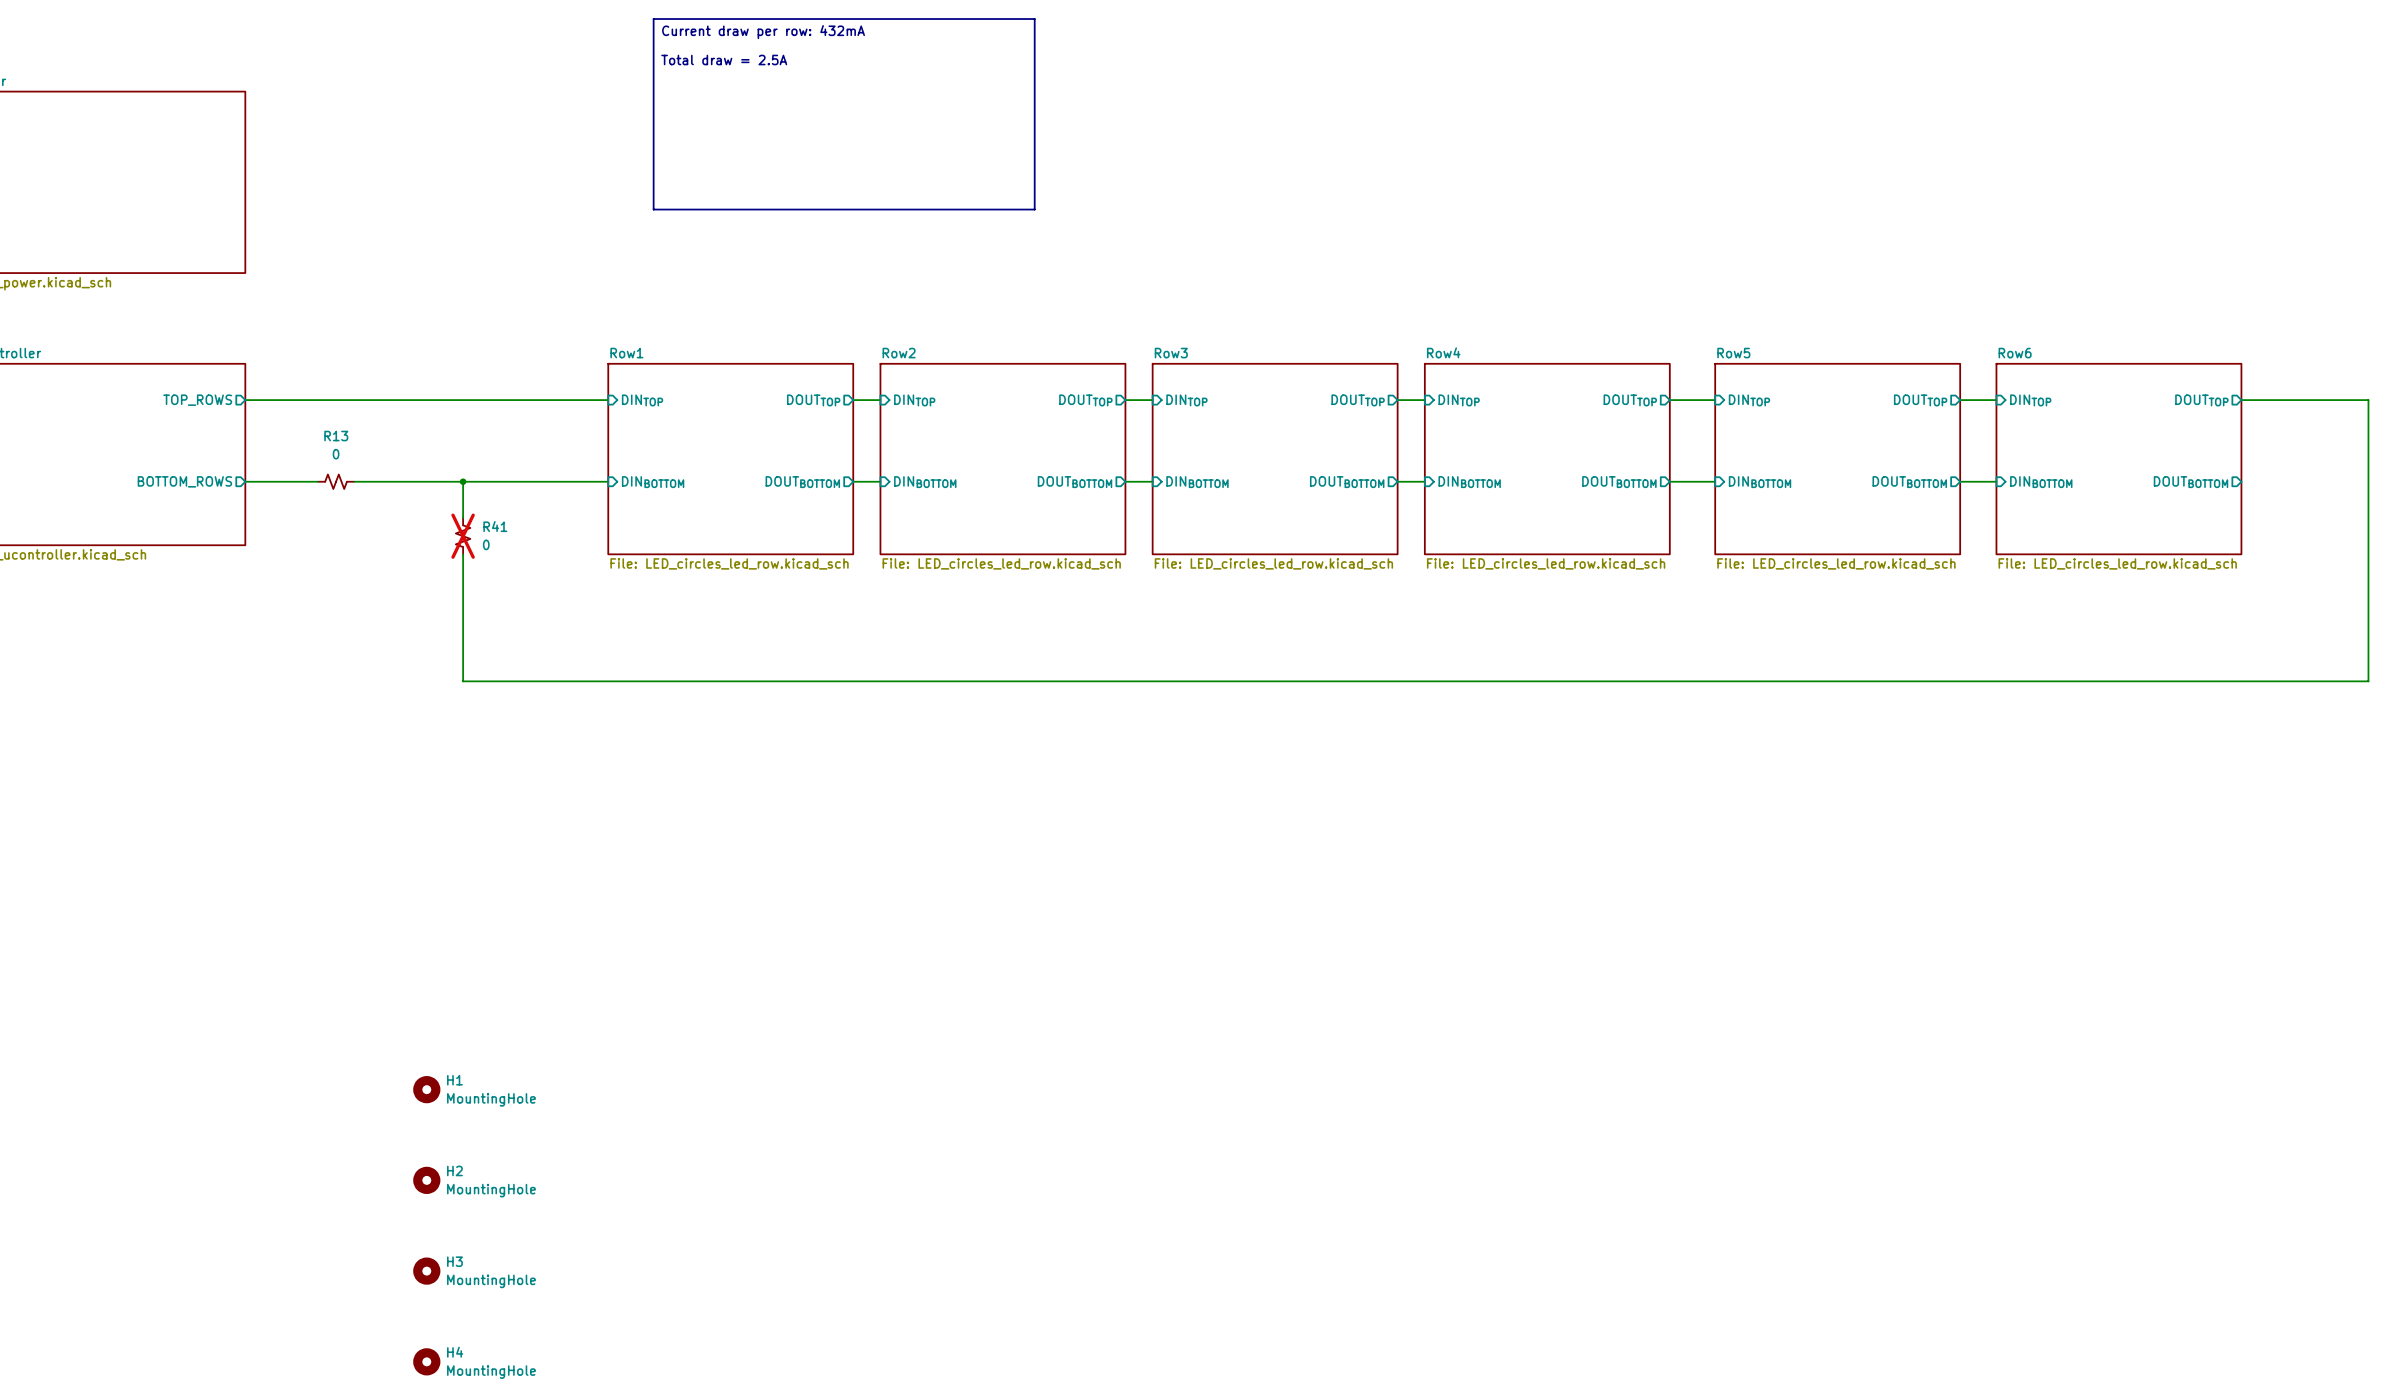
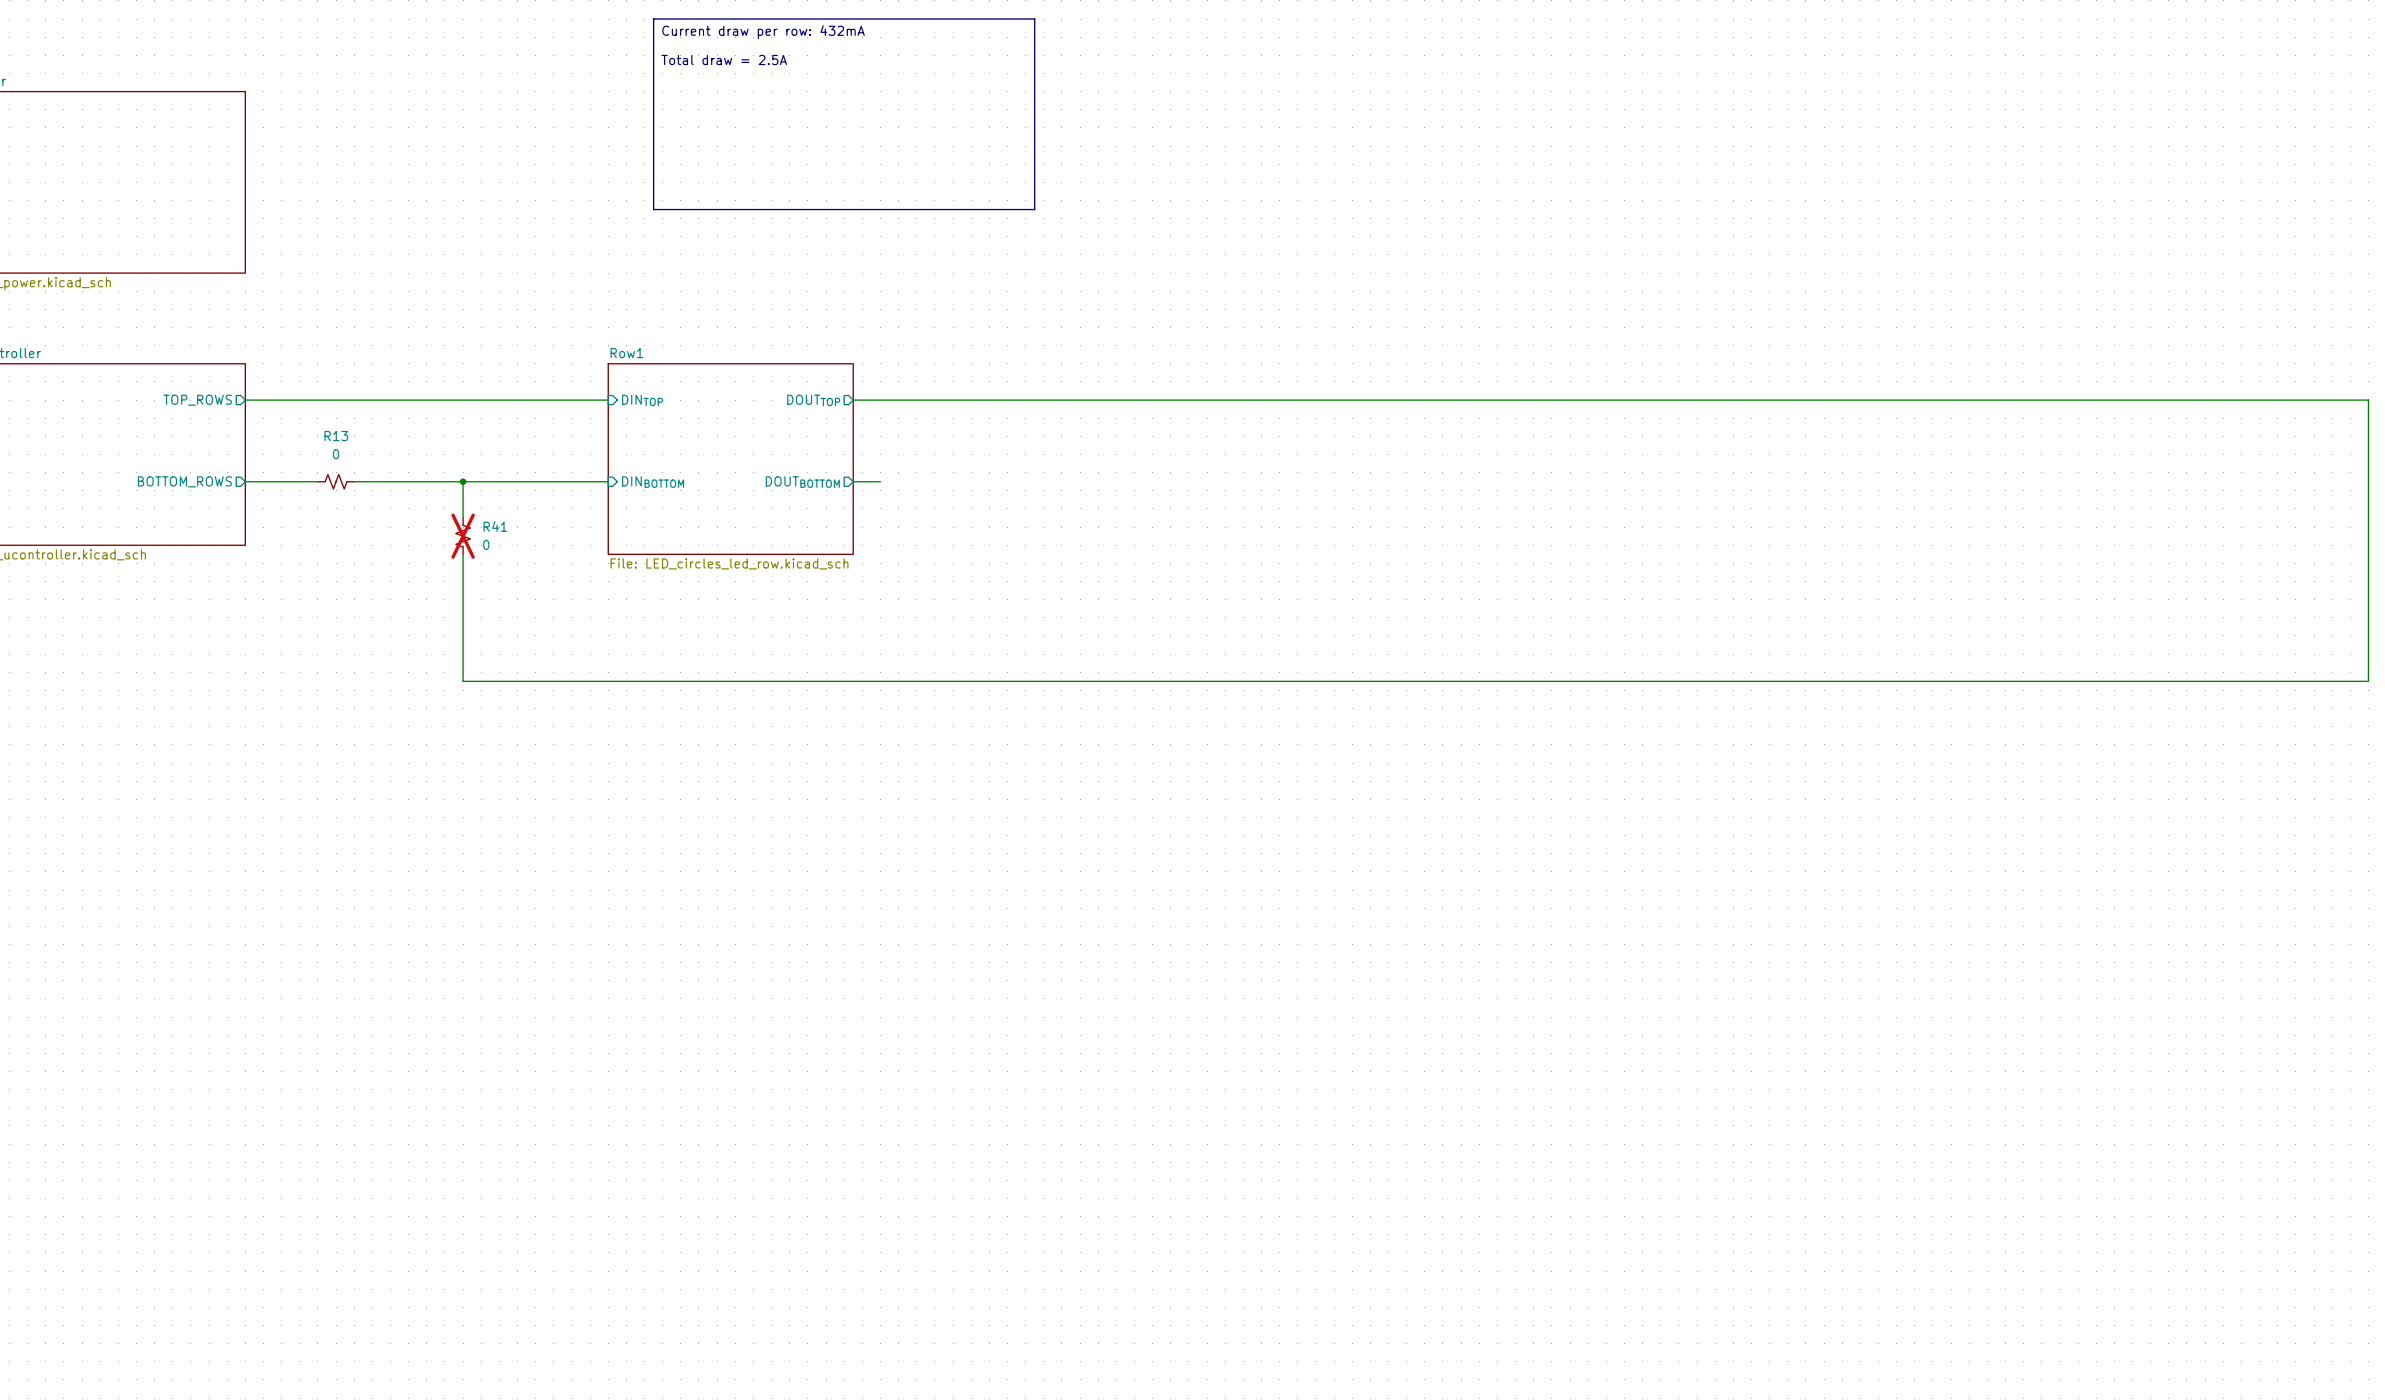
wire: none -> (880, 400) (1125, 400)
sheet pin: DINTOP (914, 400) -> none
sheet pin: DOUTTOP (1085, 400) -> none
wire: none -> (1152, 400) (1397, 400)
sheet pin: DINTOP (1186, 400) -> none
sheet pin: DOUTTOP (1358, 400) -> none
wire: none -> (1424, 400) (1669, 400)
sheet pin: DINTOP (1459, 400) -> none
sheet pin: DOUTTOP (1630, 400) -> none
wire: none -> (1715, 400) (1960, 400)
sheet pin: DINTOP (1749, 400) -> none
sheet pin: DOUTTOP (1920, 400) -> none
wire: none -> (1996, 400) (2241, 400)
sheet pin: DINTOP (2030, 400) -> none
sheet pin: DOUTTOP (2201, 400) -> none
sheet Row2: File: LED_circles_led_row.kicad_sch (1002, 459) -> none
sheet Row3: File: LED_circles_led_row.kicad_sch (1275, 459) -> none
sheet Row4: File: LED_circles_led_row.kicad_sch (1547, 459) -> none
sheet Row5: File: LED_circles_led_row.kicad_sch (1837, 459) -> none
sheet Row6: File: LED_circles_led_row.kicad_sch (2118, 459) -> none
wire: (1125, 481) (1152, 481) -> none
wire: (1397, 481) (1424, 481) -> none
wire: (1669, 481) (1715, 481) -> none
wire: (1960, 481) (1996, 481) -> none
sheet pin: DINBOTTOM (925, 482) -> none
sheet pin: DOUTBOTTOM (1075, 482) -> none
sheet pin: DINBOTTOM (1197, 482) -> none
sheet pin: DOUTBOTTOM (1347, 482) -> none
sheet pin: DINBOTTOM (1469, 482) -> none
sheet pin: DOUTBOTTOM (1619, 482) -> none
sheet pin: DINBOTTOM (1760, 482) -> none
sheet pin: DOUTBOTTOM (1909, 482) -> none
sheet pin: DINBOTTOM (2041, 482) -> none
sheet pin: DOUTBOTTOM (2191, 482) -> none
H1: MountingHole (426, 1089) -> none
H2: MountingHole (426, 1180) -> none
H3: MountingHole (426, 1271) -> none
H4: MountingHole (426, 1361) -> none

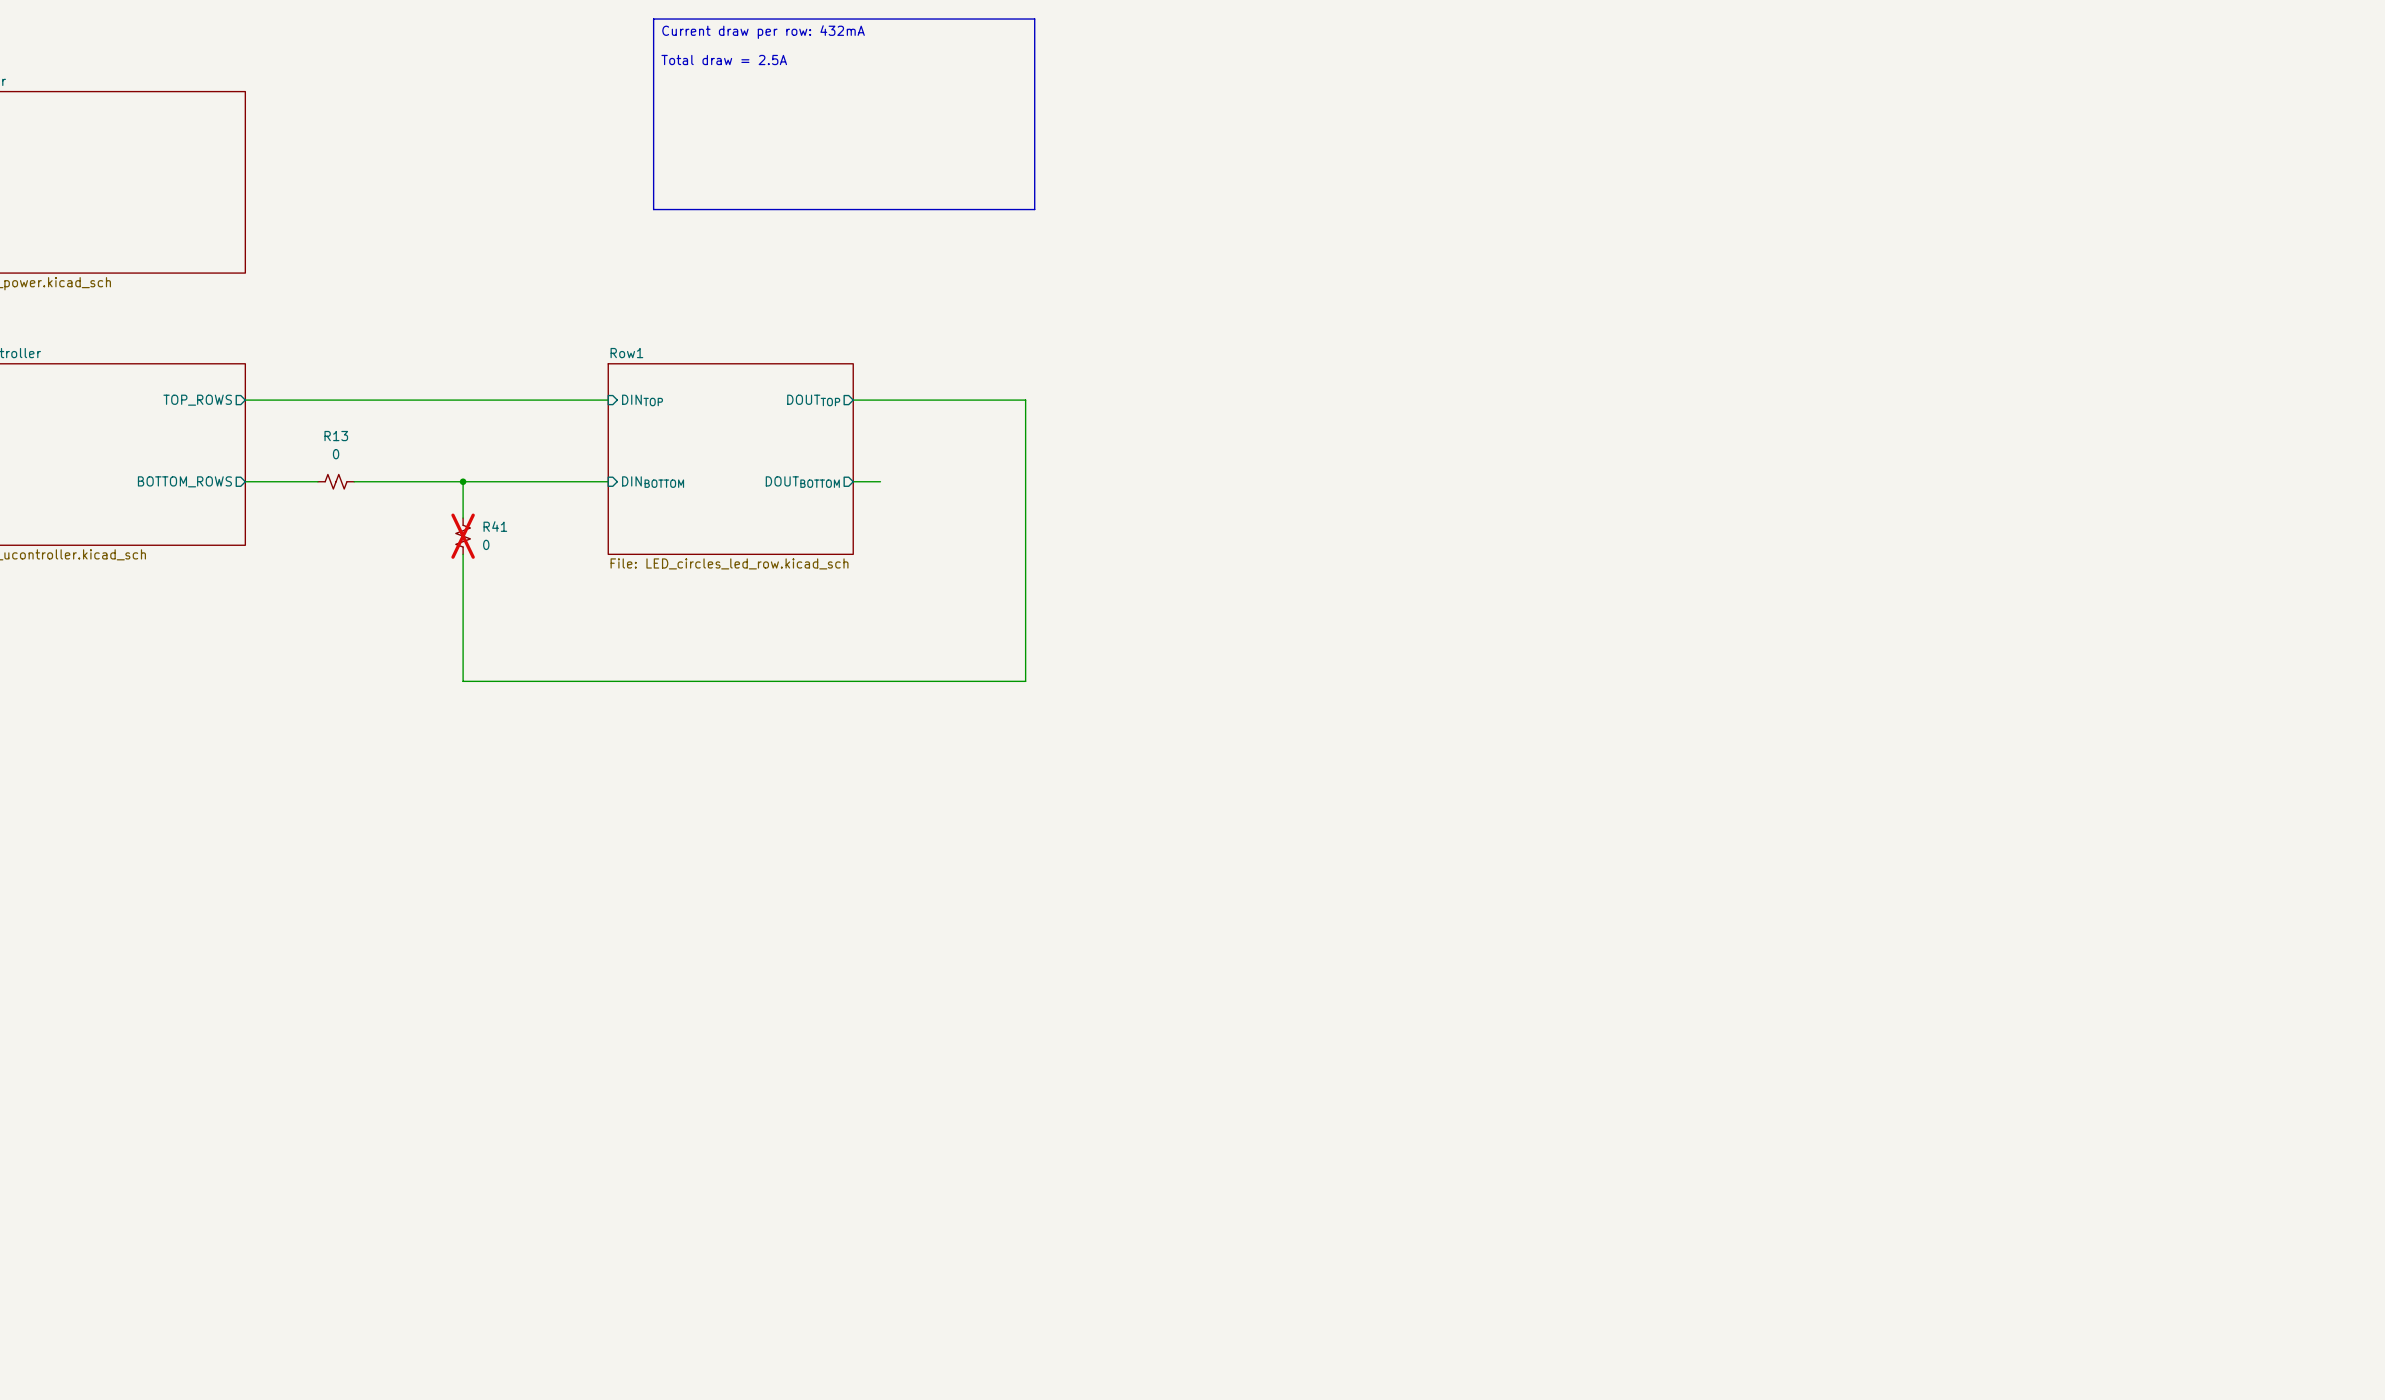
wire: (1025, 400) (2368, 400) (2368, 681) (1025, 681) -> (1025, 400) (1025, 681)

